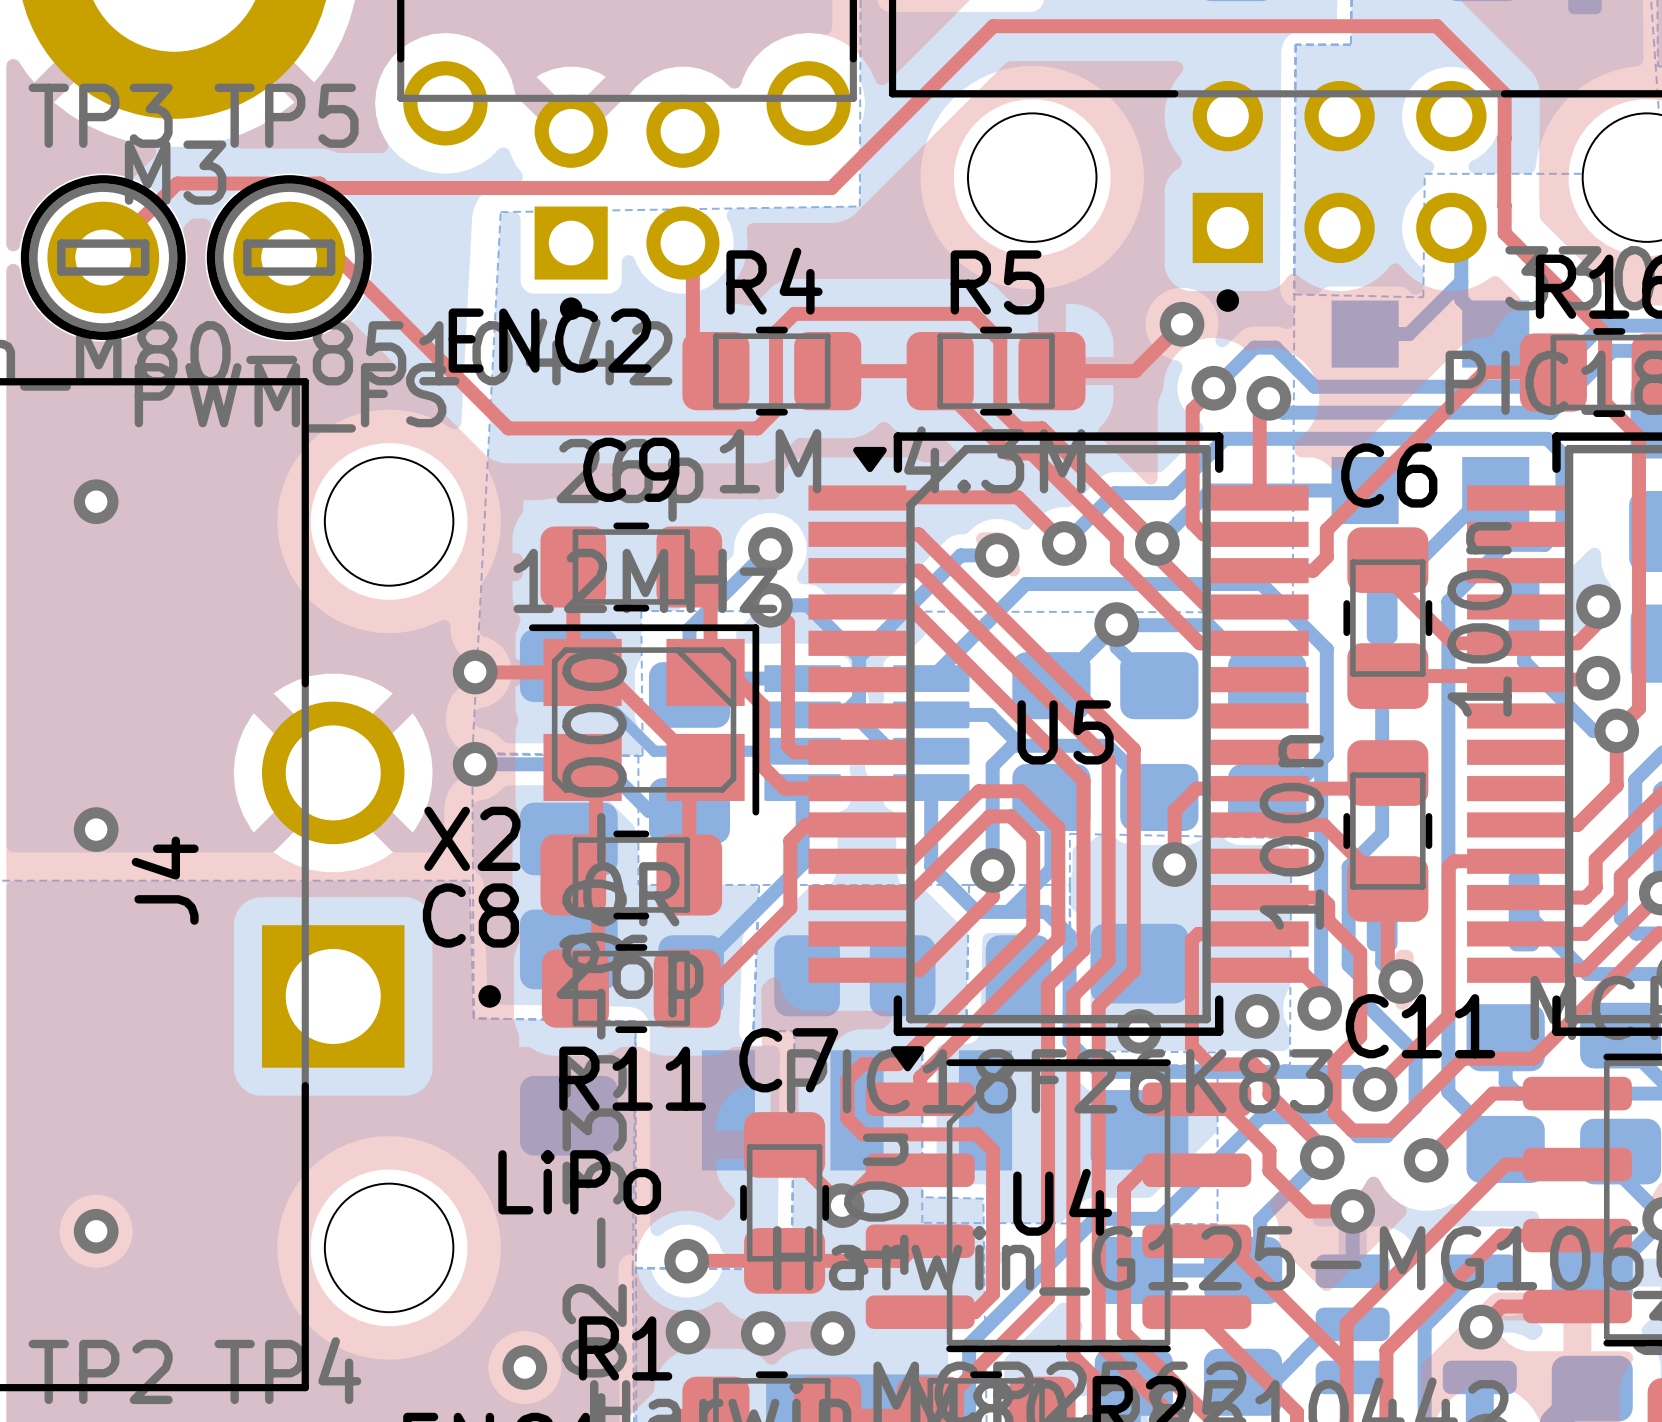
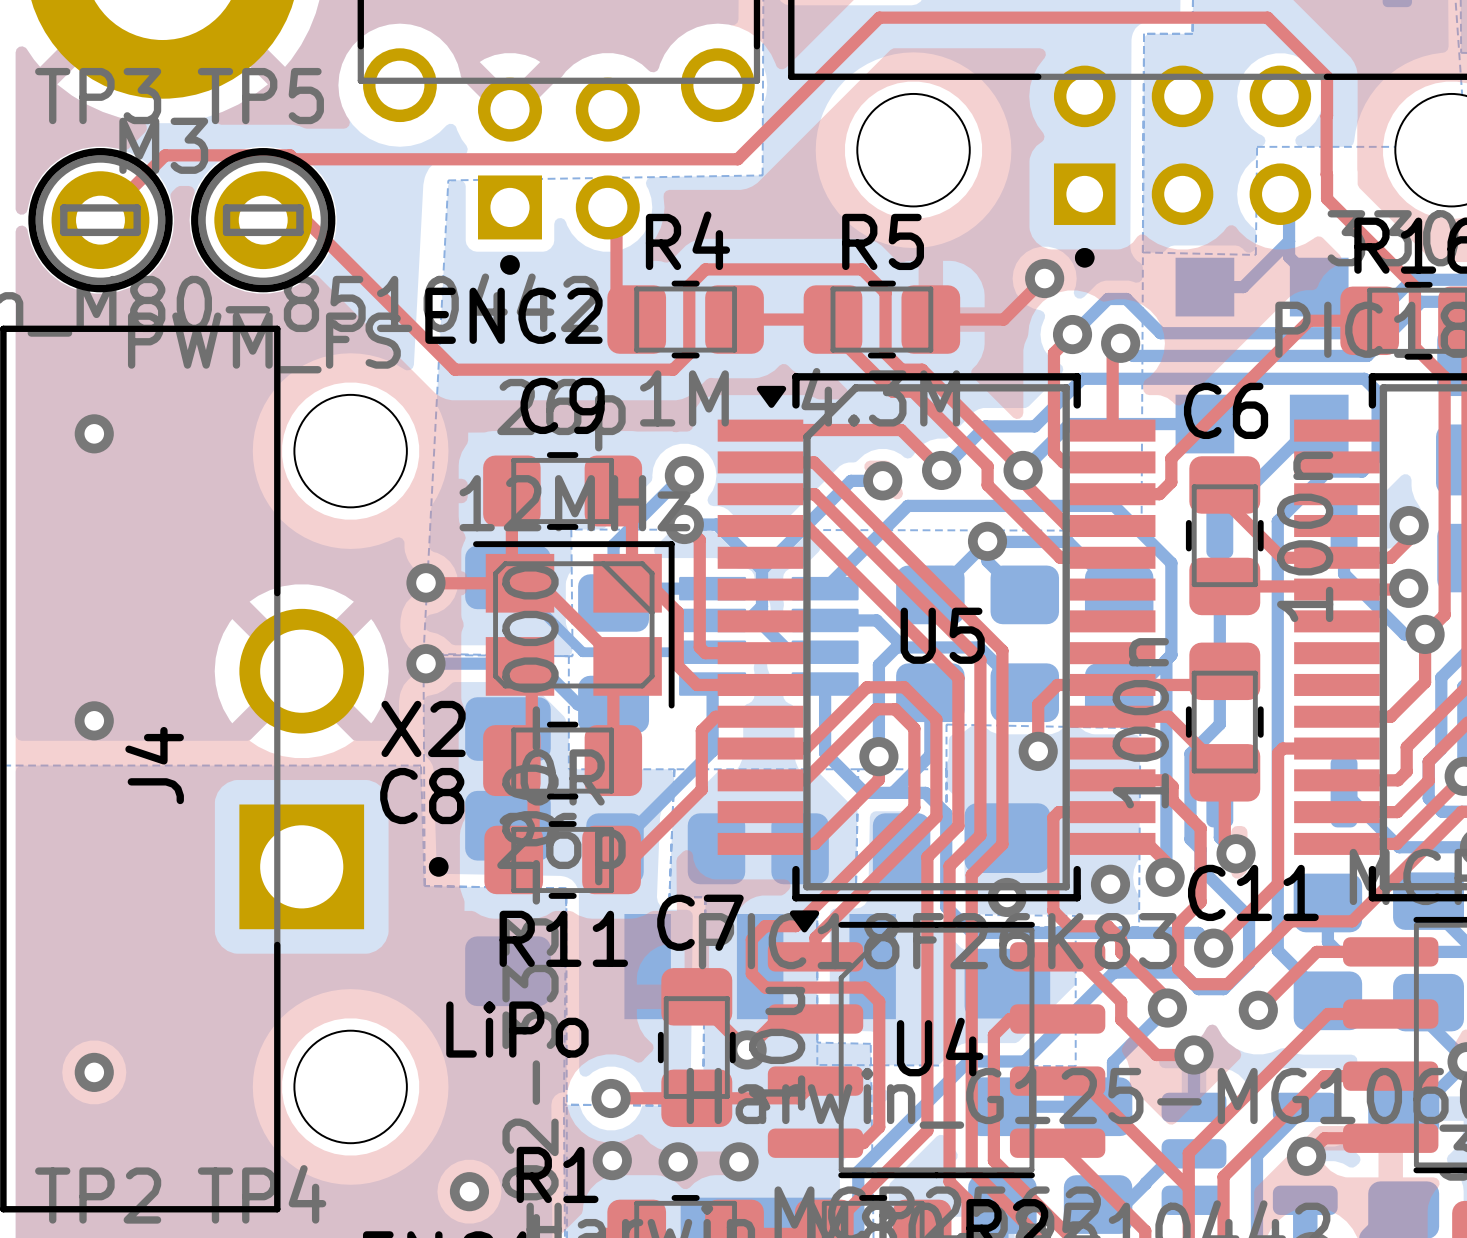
text position: ENC2 (549, 340) -> ENC2 (513, 315)

